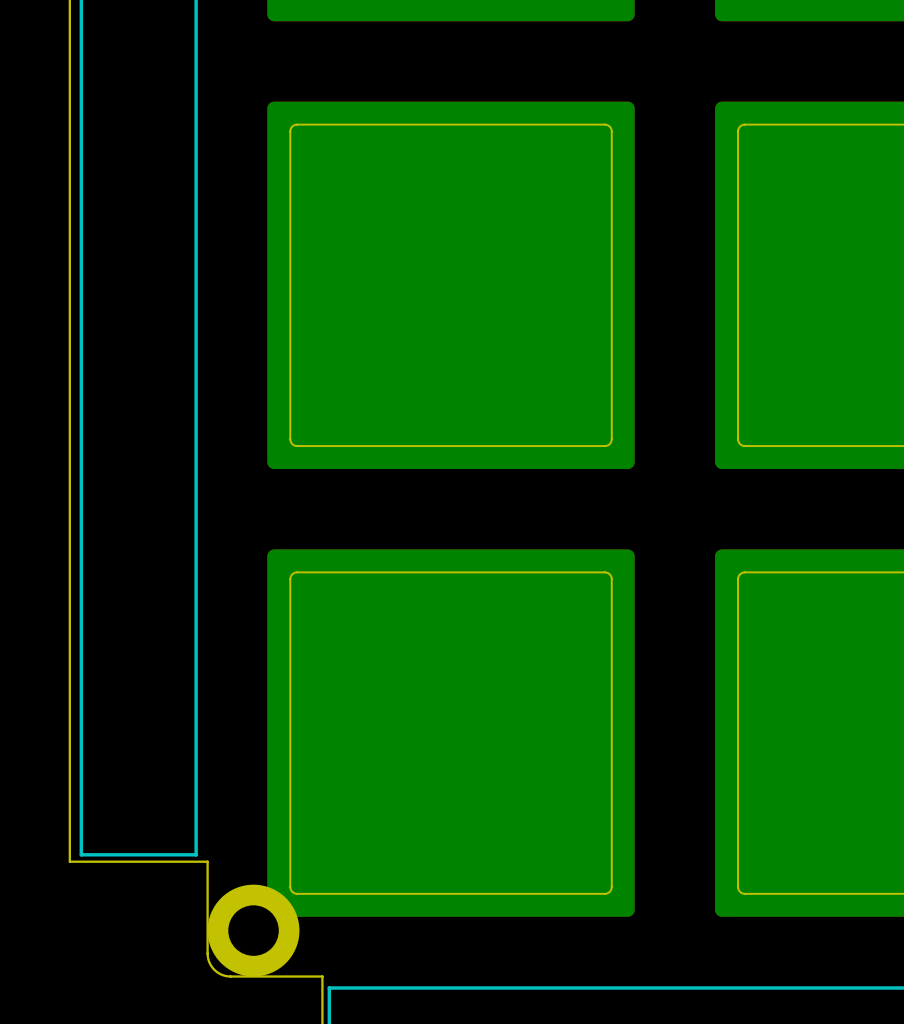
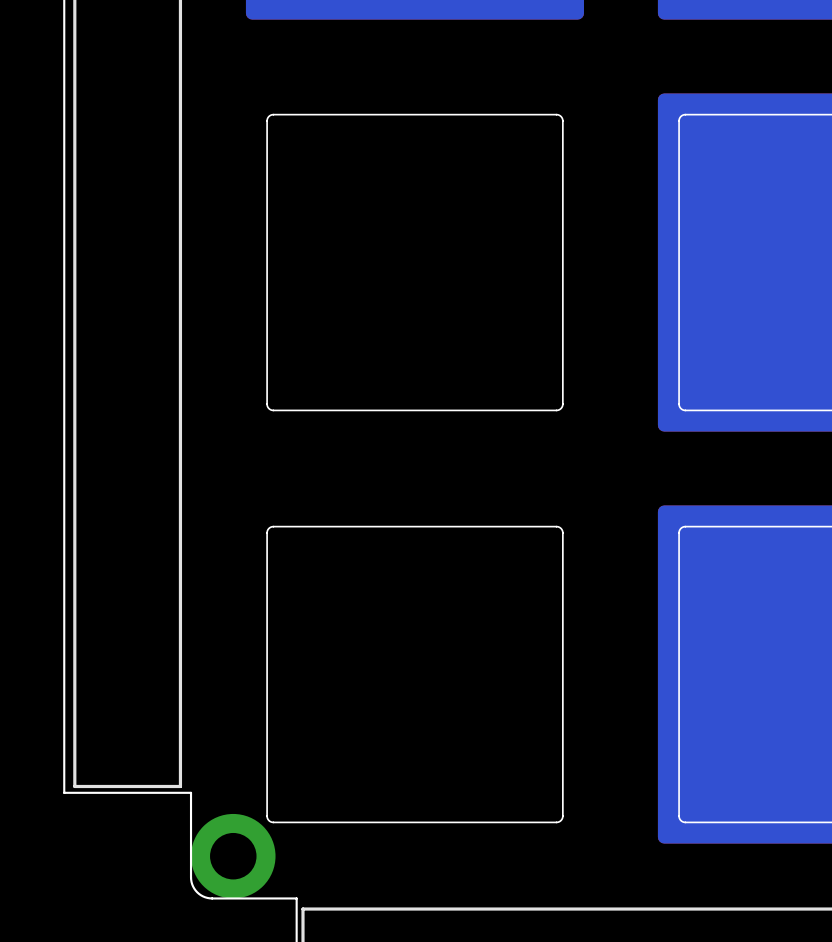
drawing: none -> [266, 114, 564, 411]
part: (451, 285) -> none
drawing: none -> [266, 526, 564, 823]
part: (451, 733) -> none

